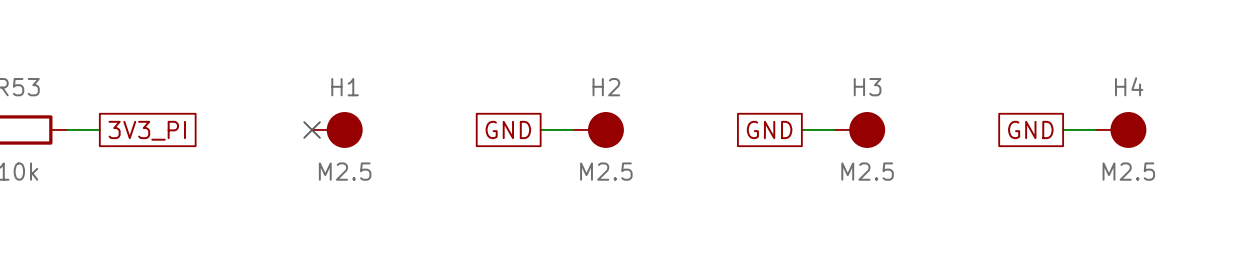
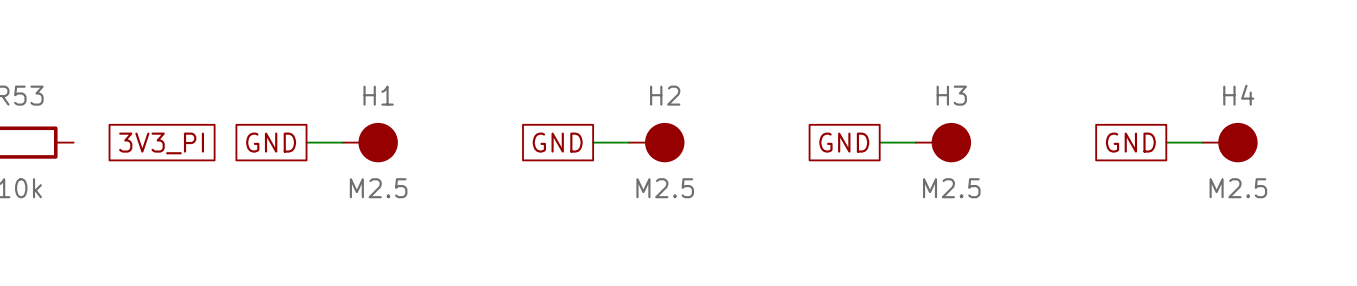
wire: (67, 129) (99, 129) -> (306, 142) (342, 142)
global label: none -> GND (271, 142)
no-connect mark: (312, 129) -> none

